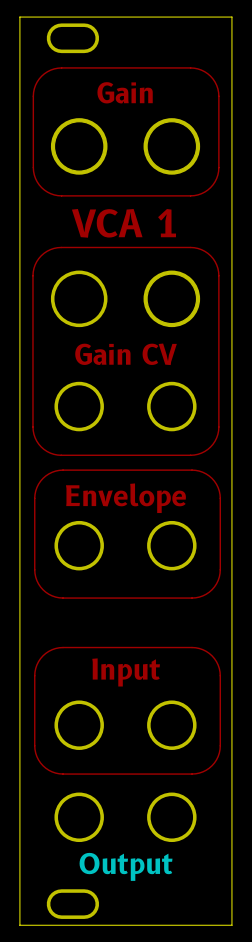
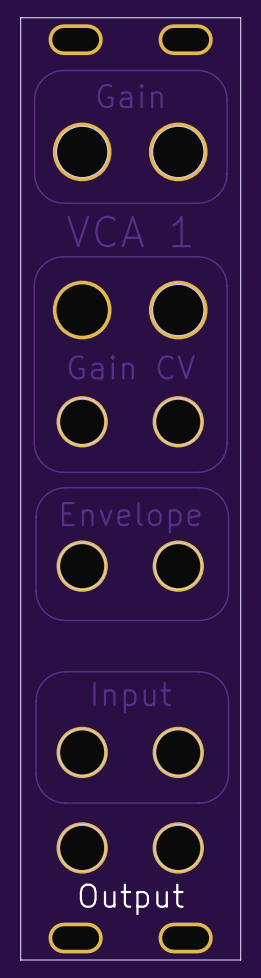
part: none -> (185, 39)
part: none -> (185, 938)

